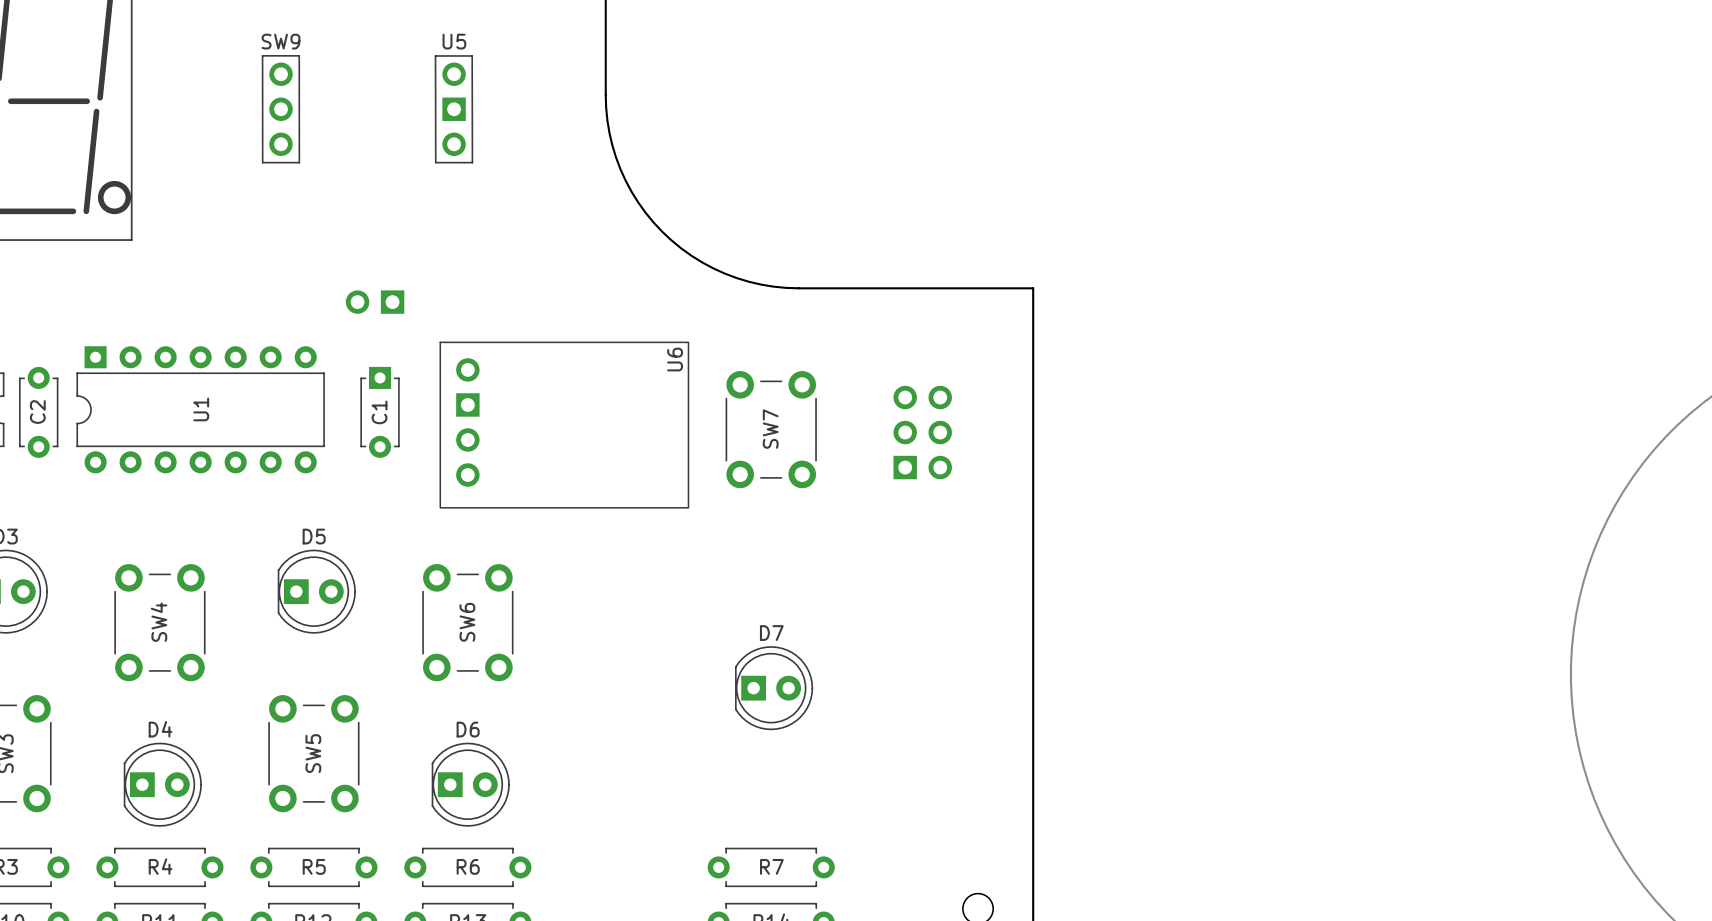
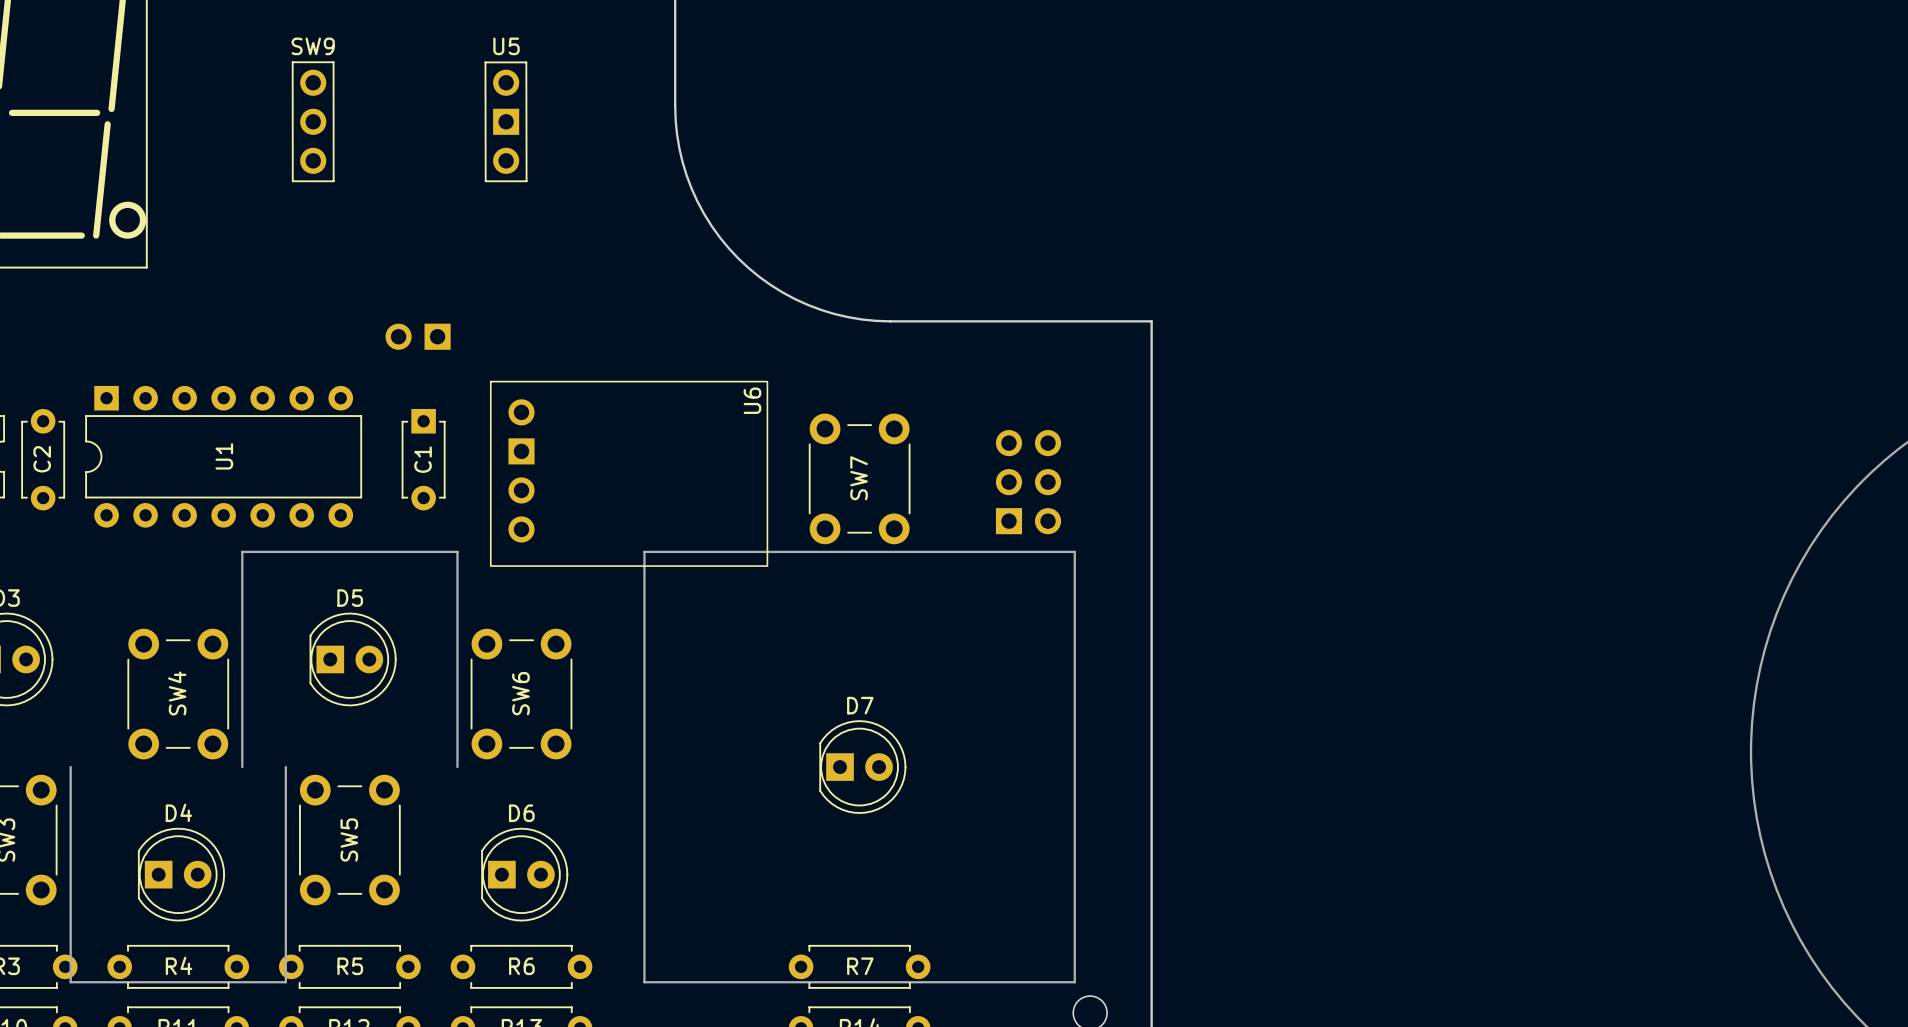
line: none -> (644, 551) (1074, 551) (1074, 982) (644, 982) (644, 551)
line: none -> (70, 767) (70, 982) (285, 982) (285, 767)
line: none -> (242, 767) (242, 551) (457, 551) (457, 767)

